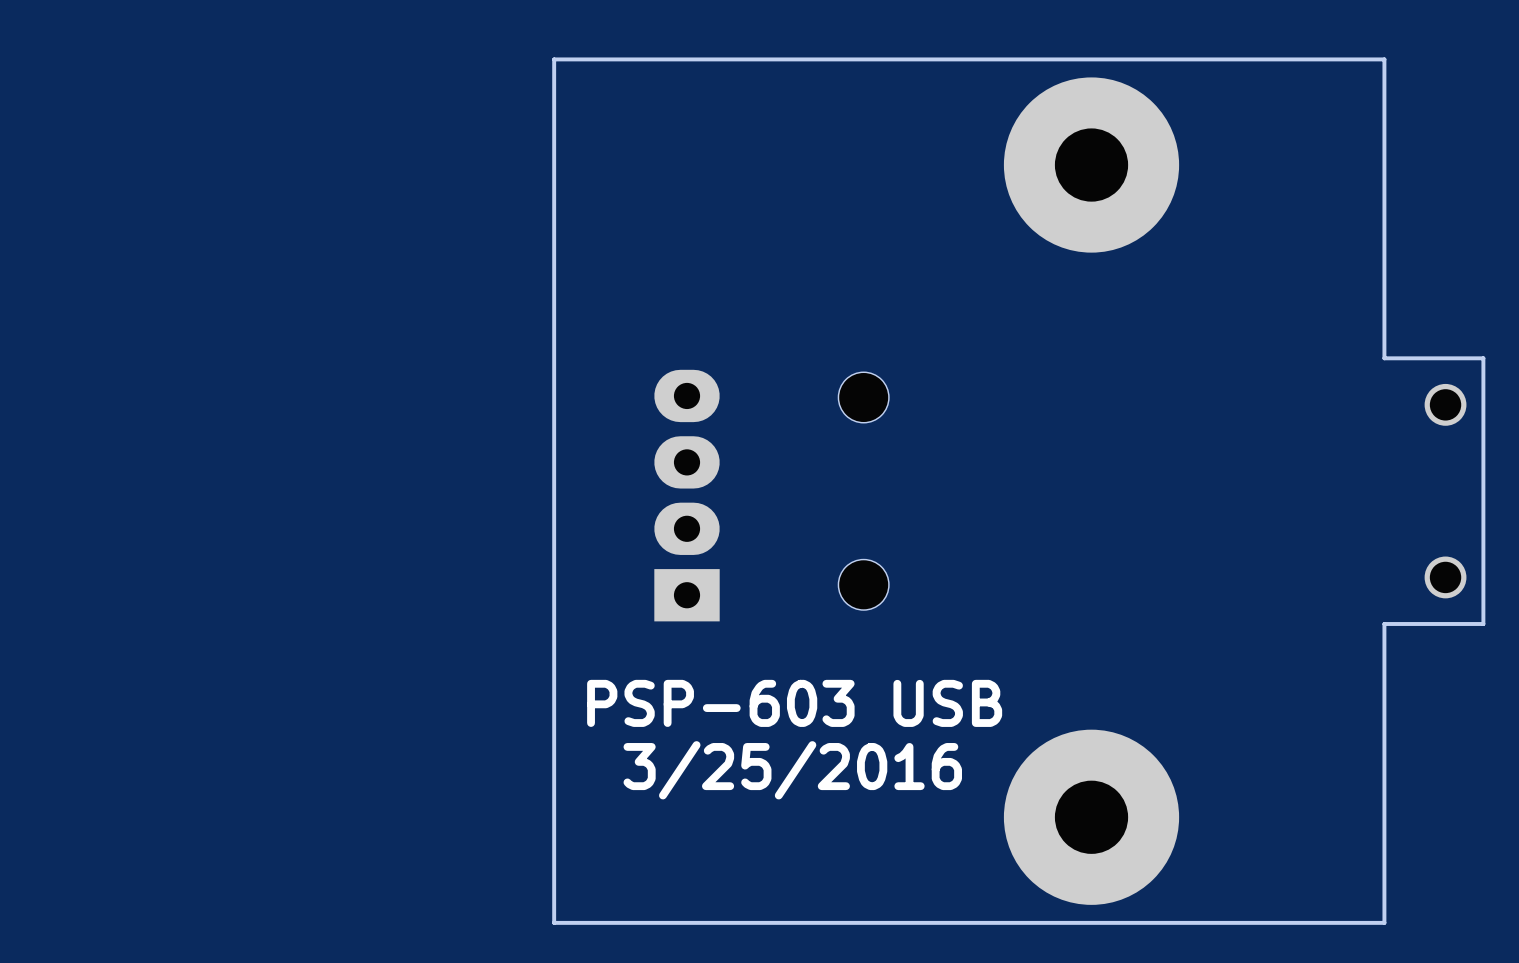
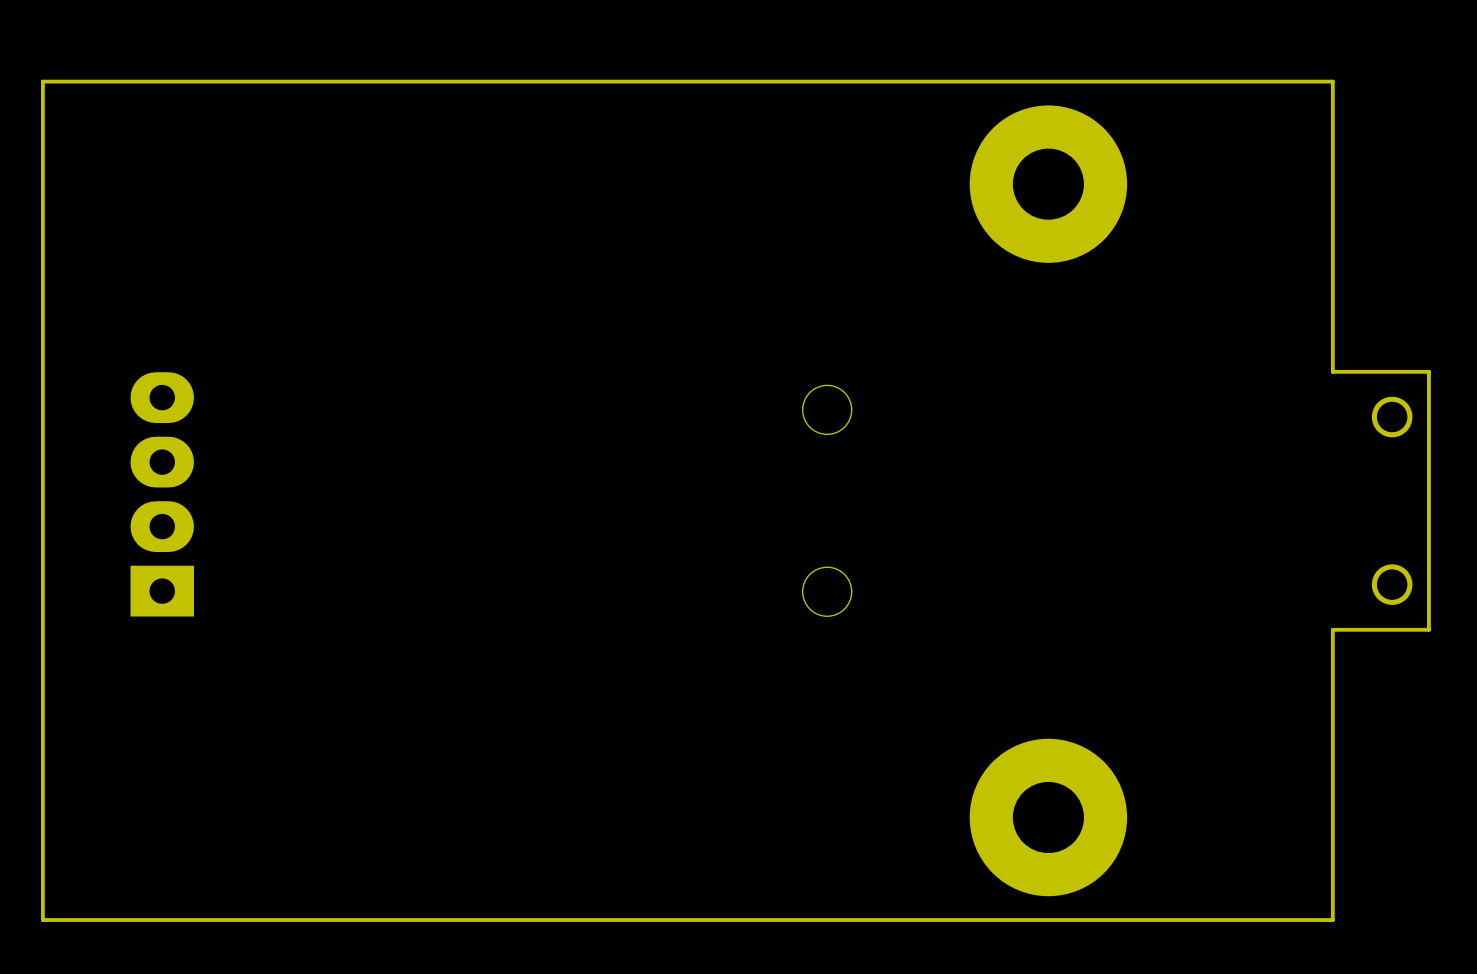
board edge: (554, 59) (554, 922) -> (526, 81) (42, 81) (42, 920) (526, 920)
part footprint: [1003, 77, 1180, 253] -> [969, 105, 1128, 263]
part position: (687, 495) -> (162, 494)
text: PSP-603 USB (794, 703) -> none
part footprint: [1003, 729, 1180, 905] -> [969, 738, 1128, 897]
text: 3/25/2016 (792, 770) -> none

